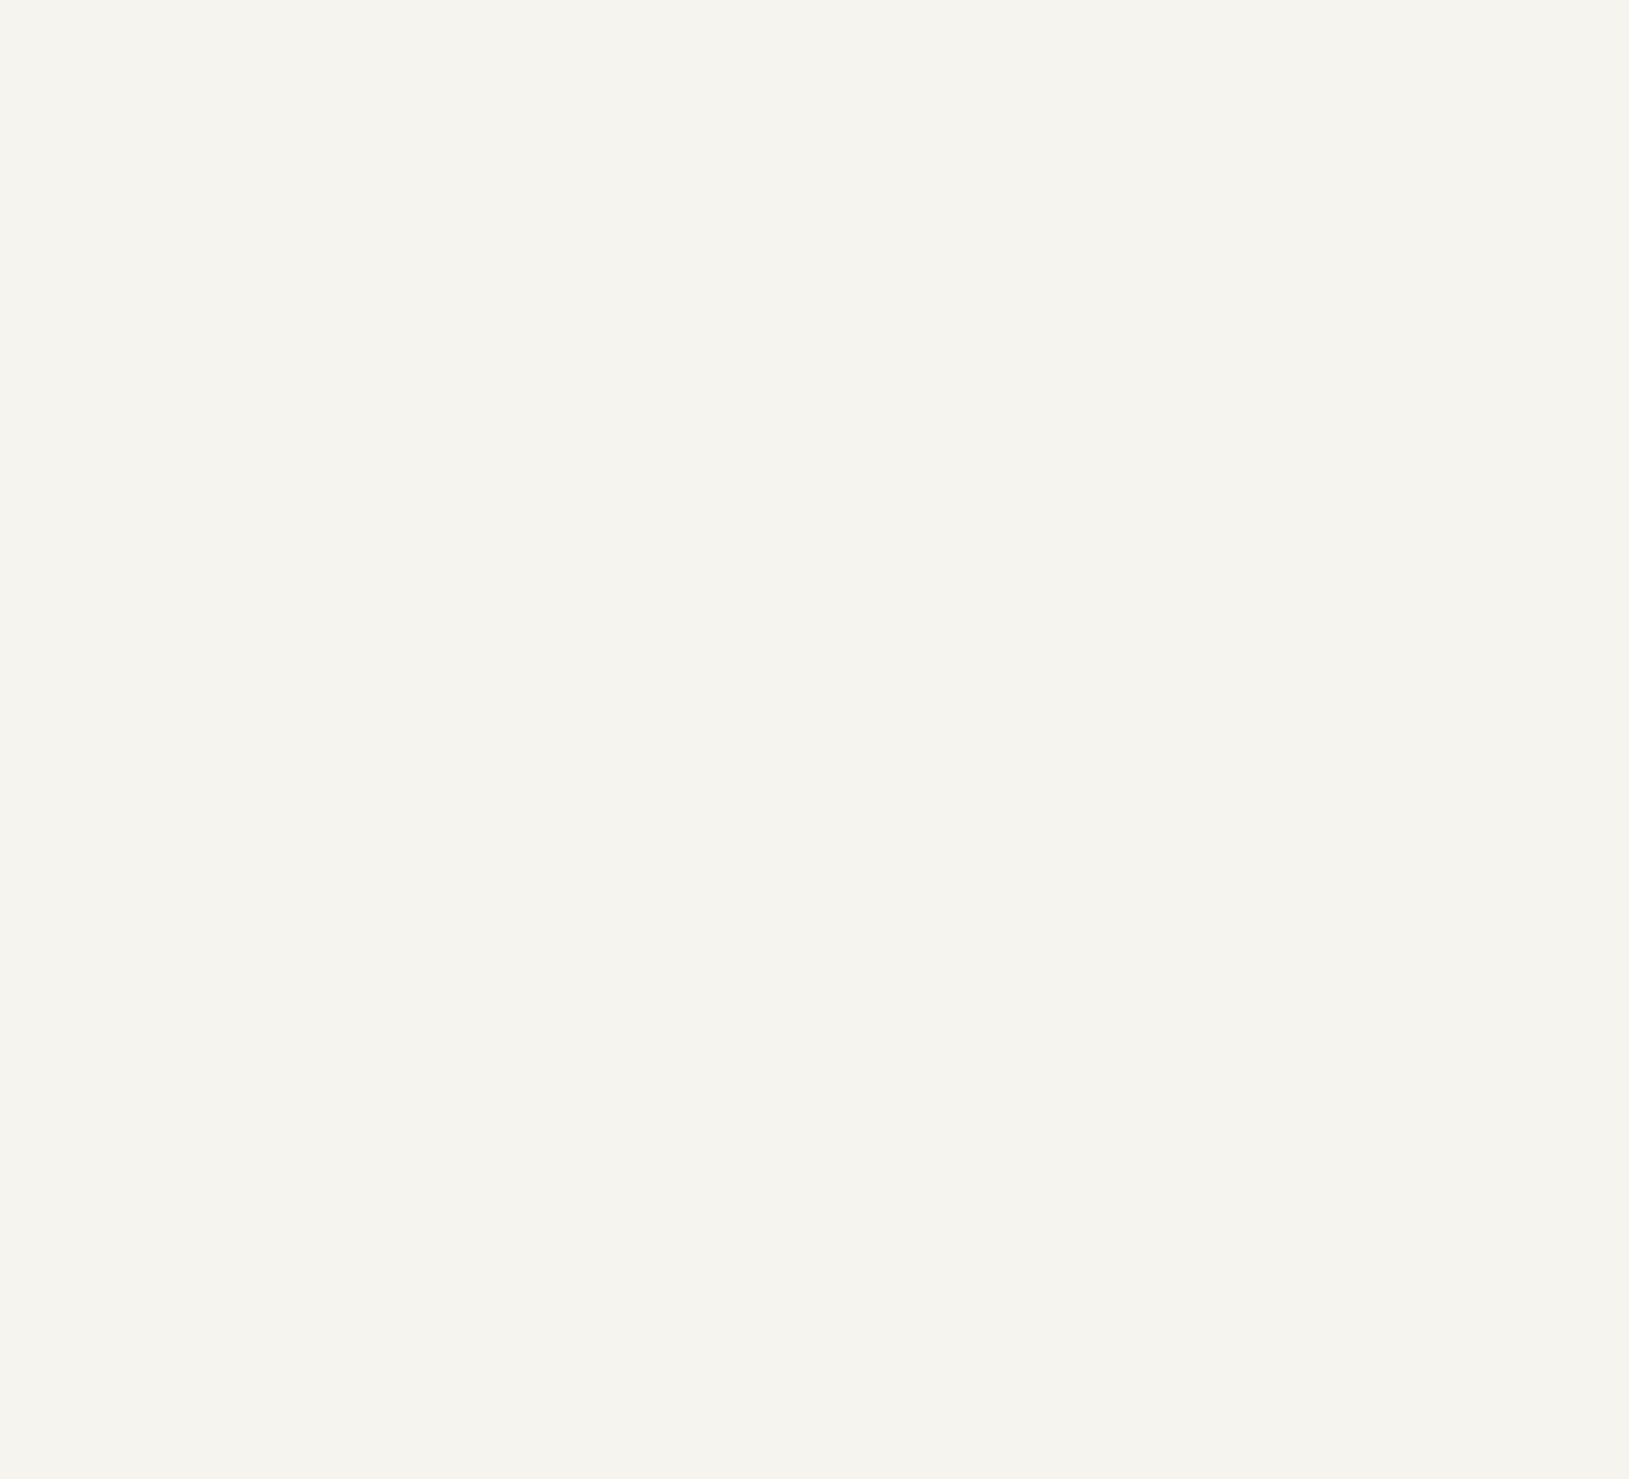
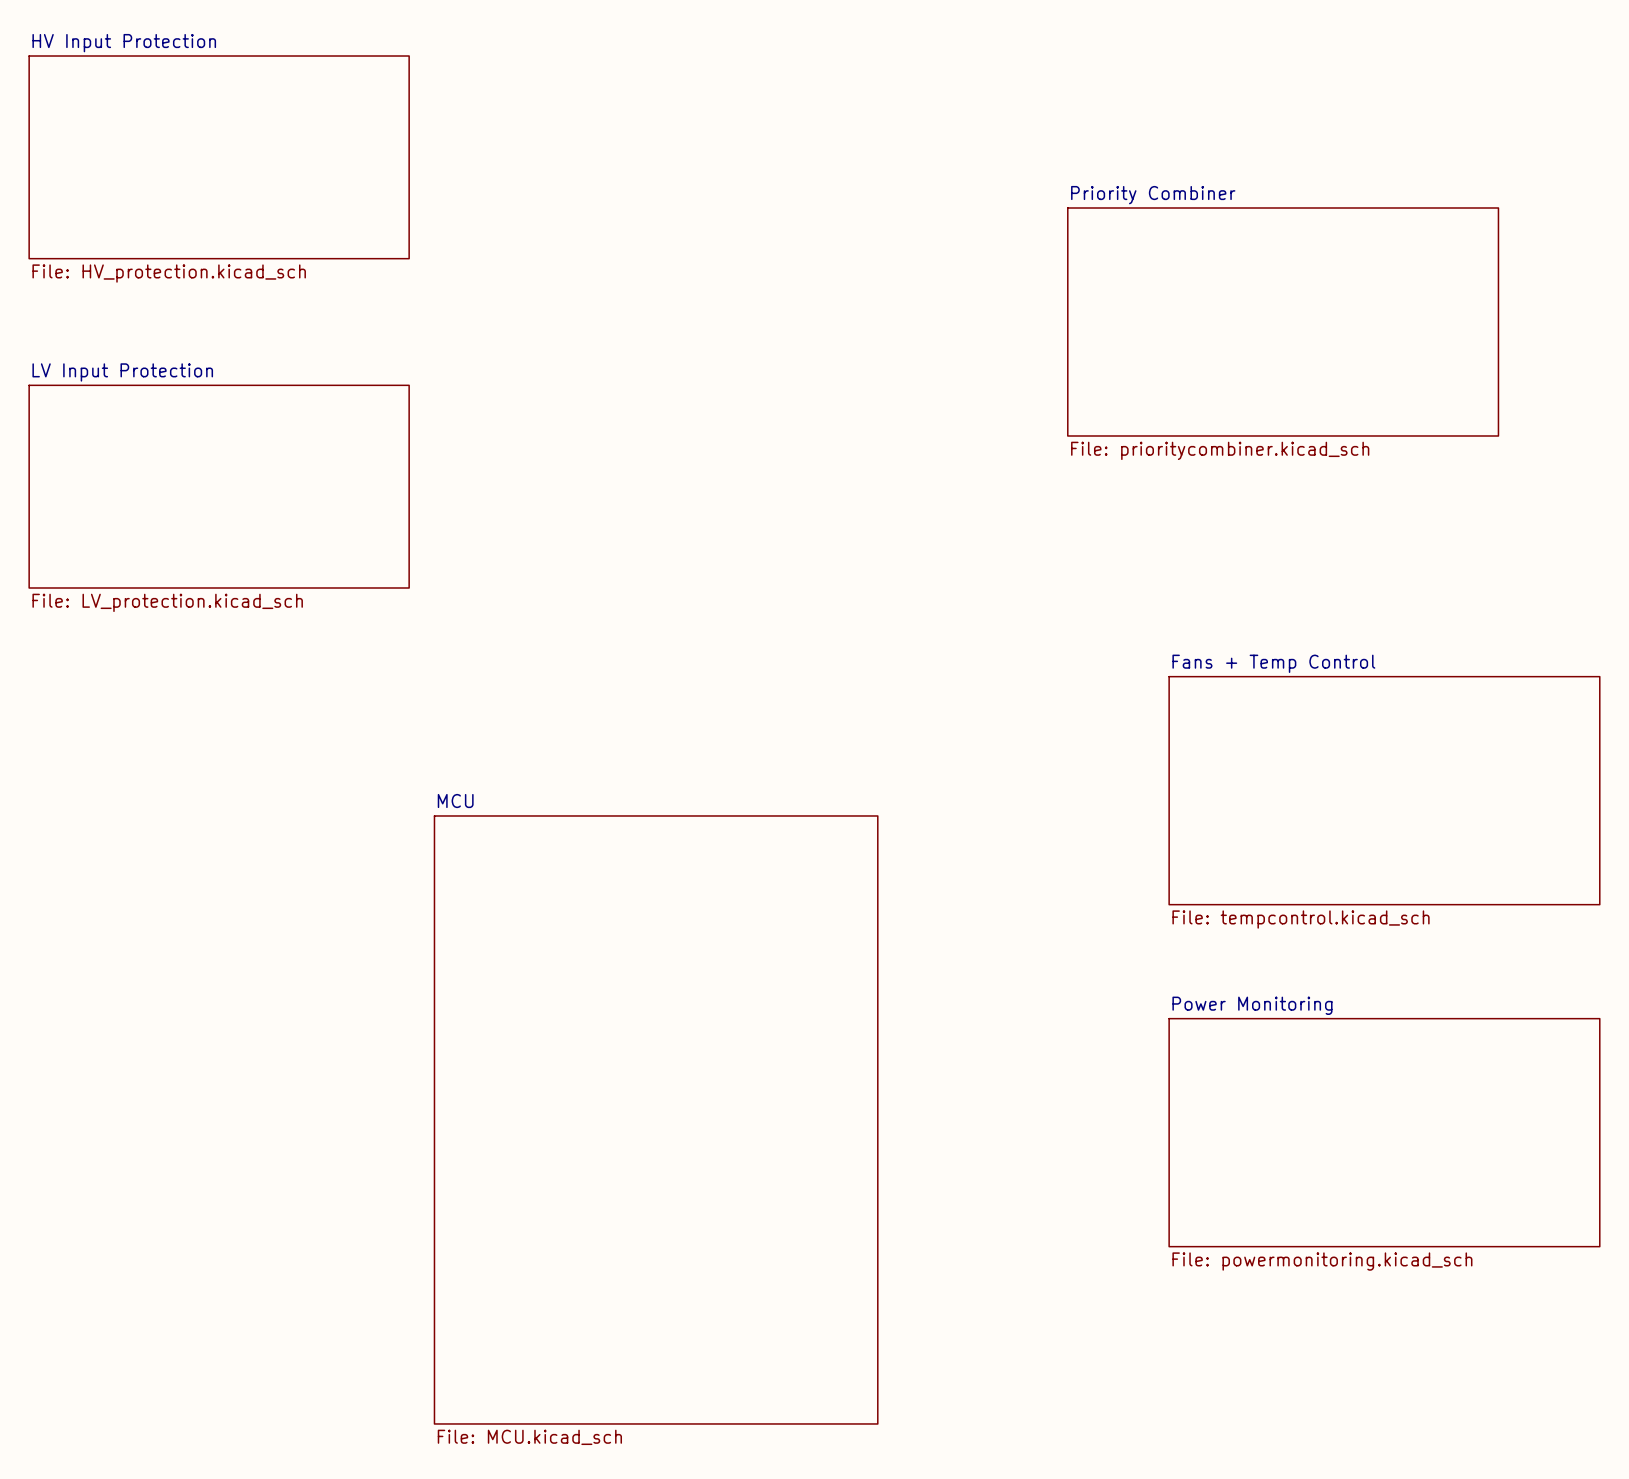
sheet HV Input Protection: none -> File: HV_protection.kicad_sch (219, 157)
sheet Priority Combiner: none -> File: prioritycombiner.kicad_sch (1283, 322)
sheet LV Input Protection: none -> File: LV_protection.kicad_sch (219, 486)
sheet Fans + Temp Control: none -> File: tempcontrol.kicad_sch (1384, 790)
sheet MCU: none -> File: MCU.kicad_sch (656, 1119)
sheet Power Monitoring: none -> File: powermonitoring.kicad_sch (1384, 1132)

